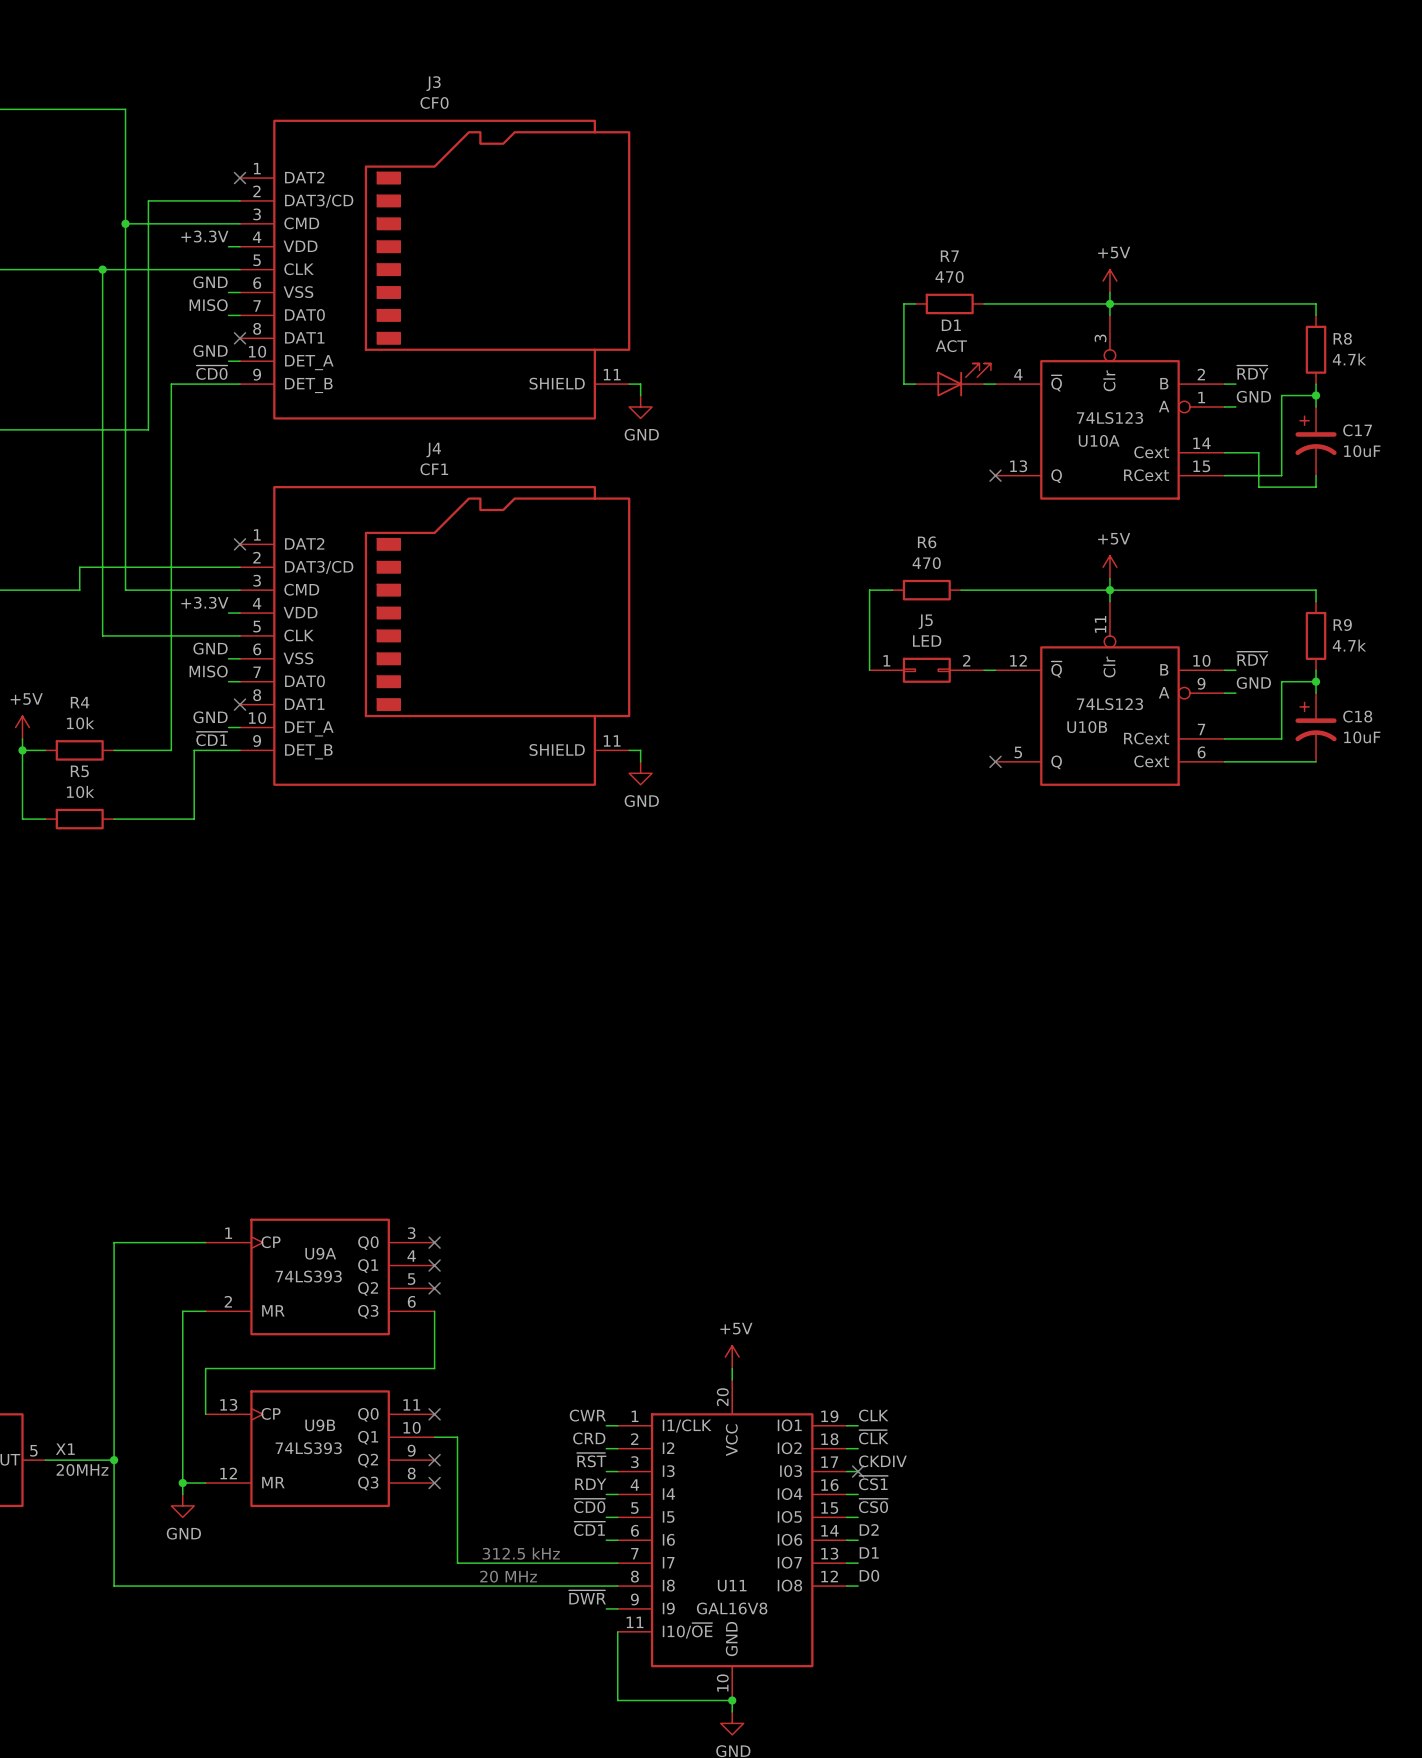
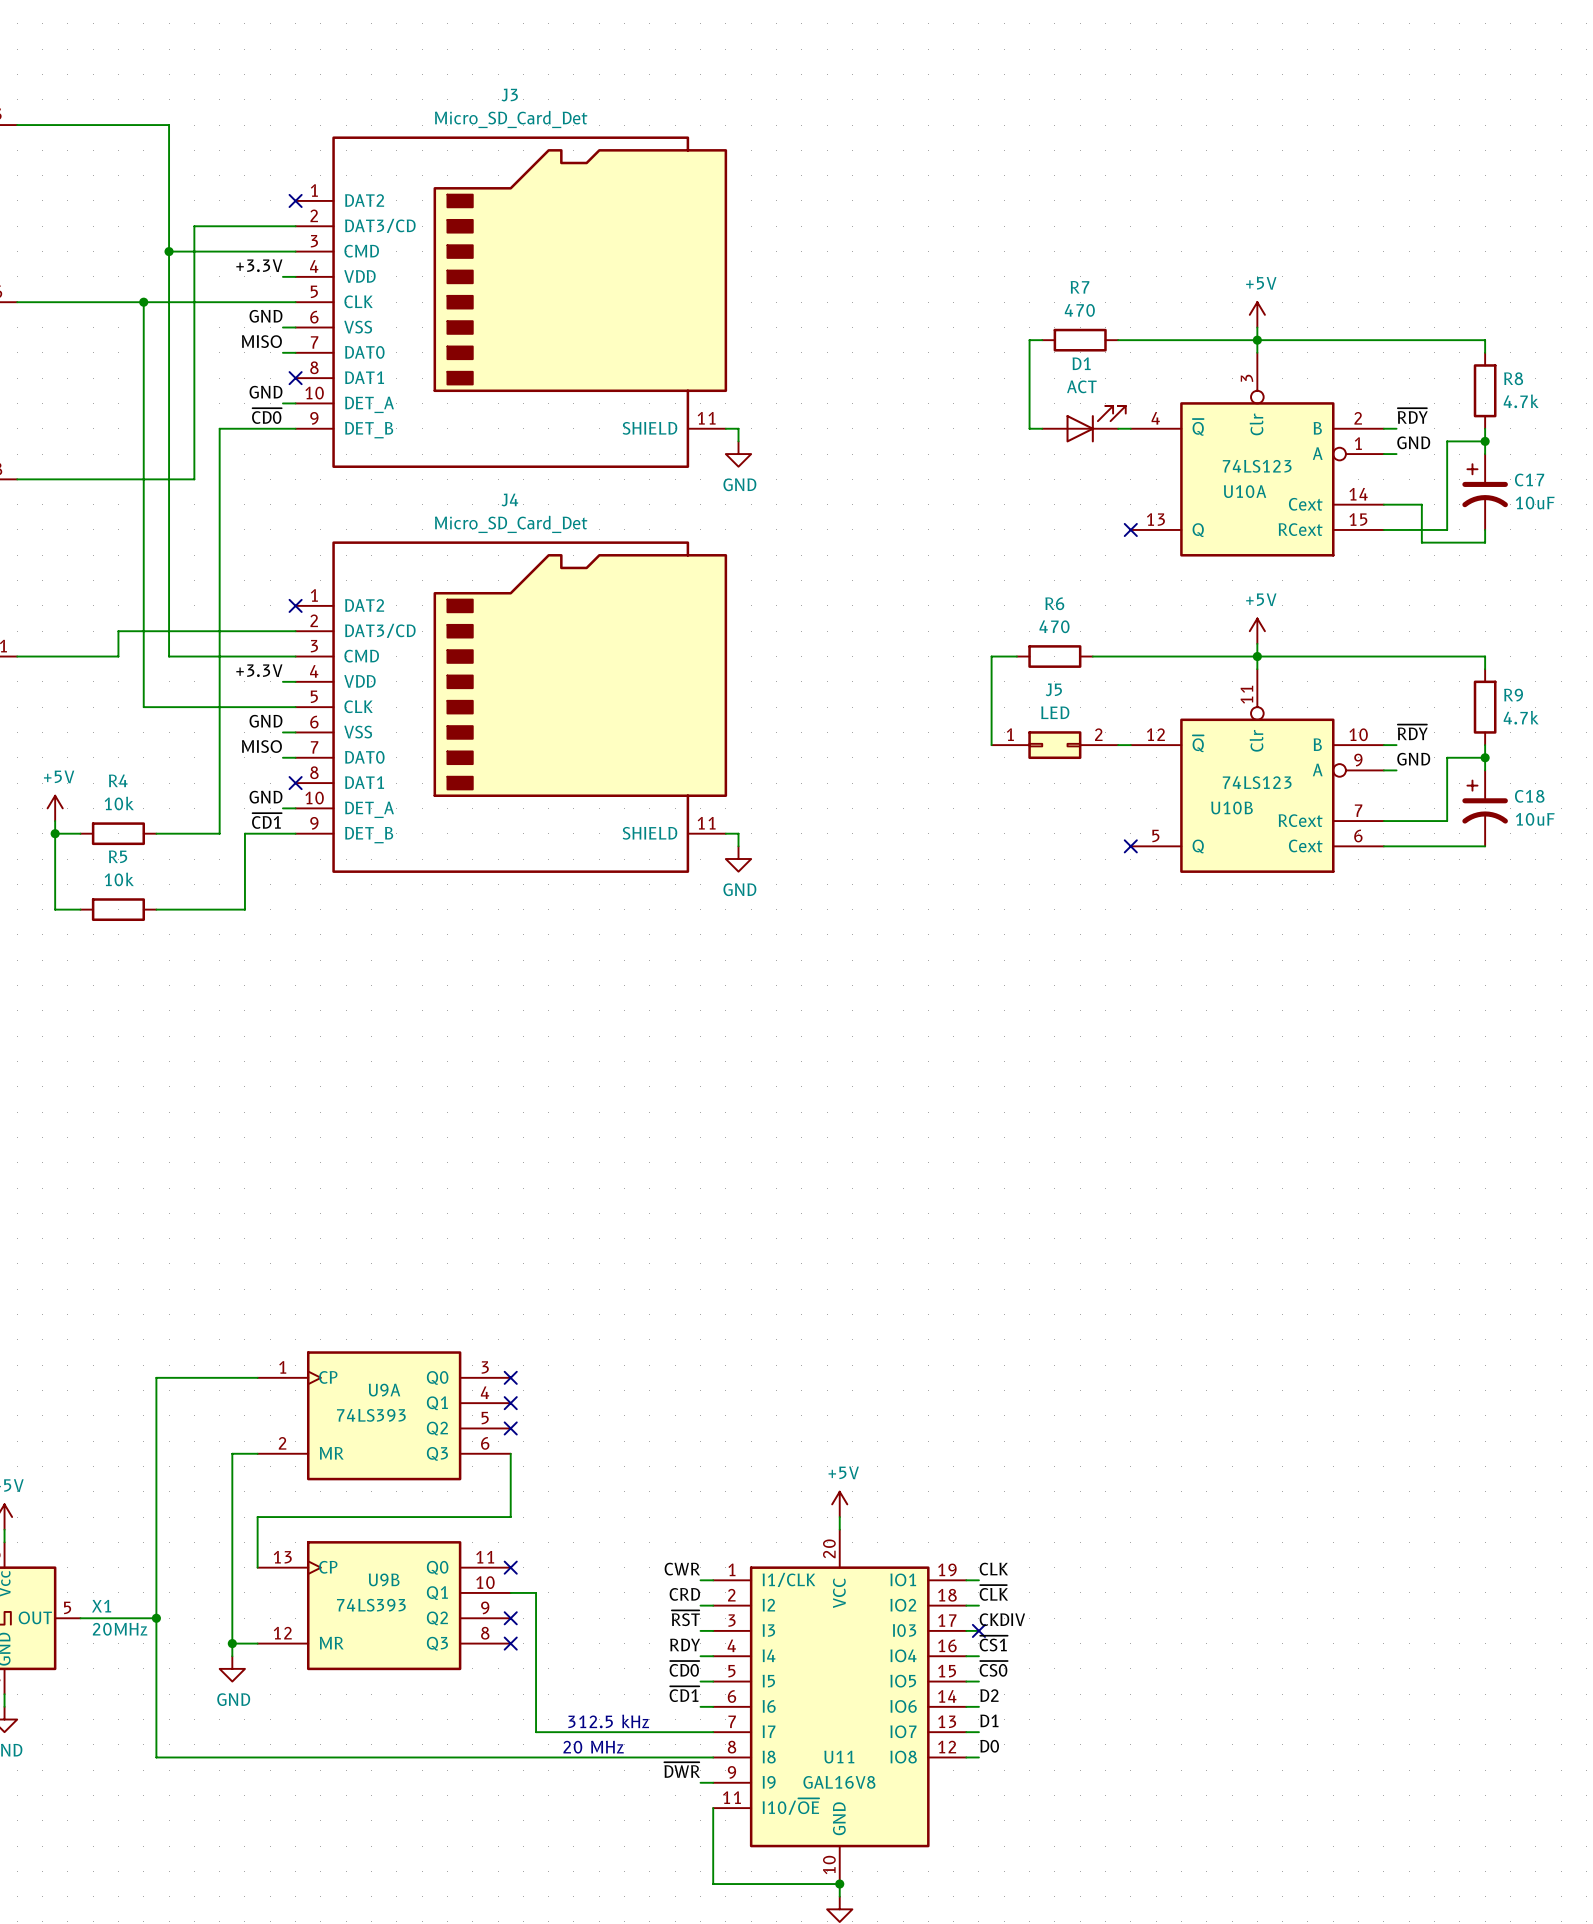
J3 value: CF0 (434, 102) -> Micro_SD_Card_Det (511, 119)
J4 value: CF1 (434, 469) -> Micro_SD_Card_Det (511, 524)

